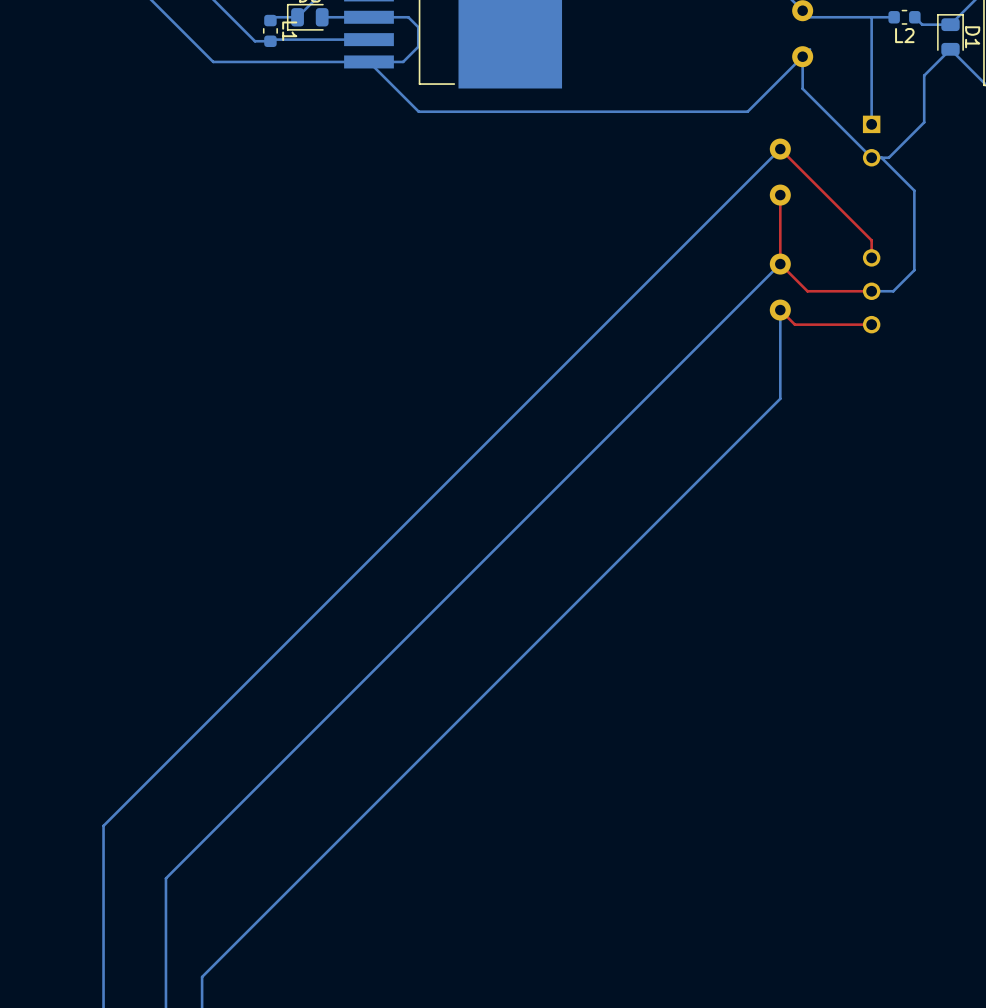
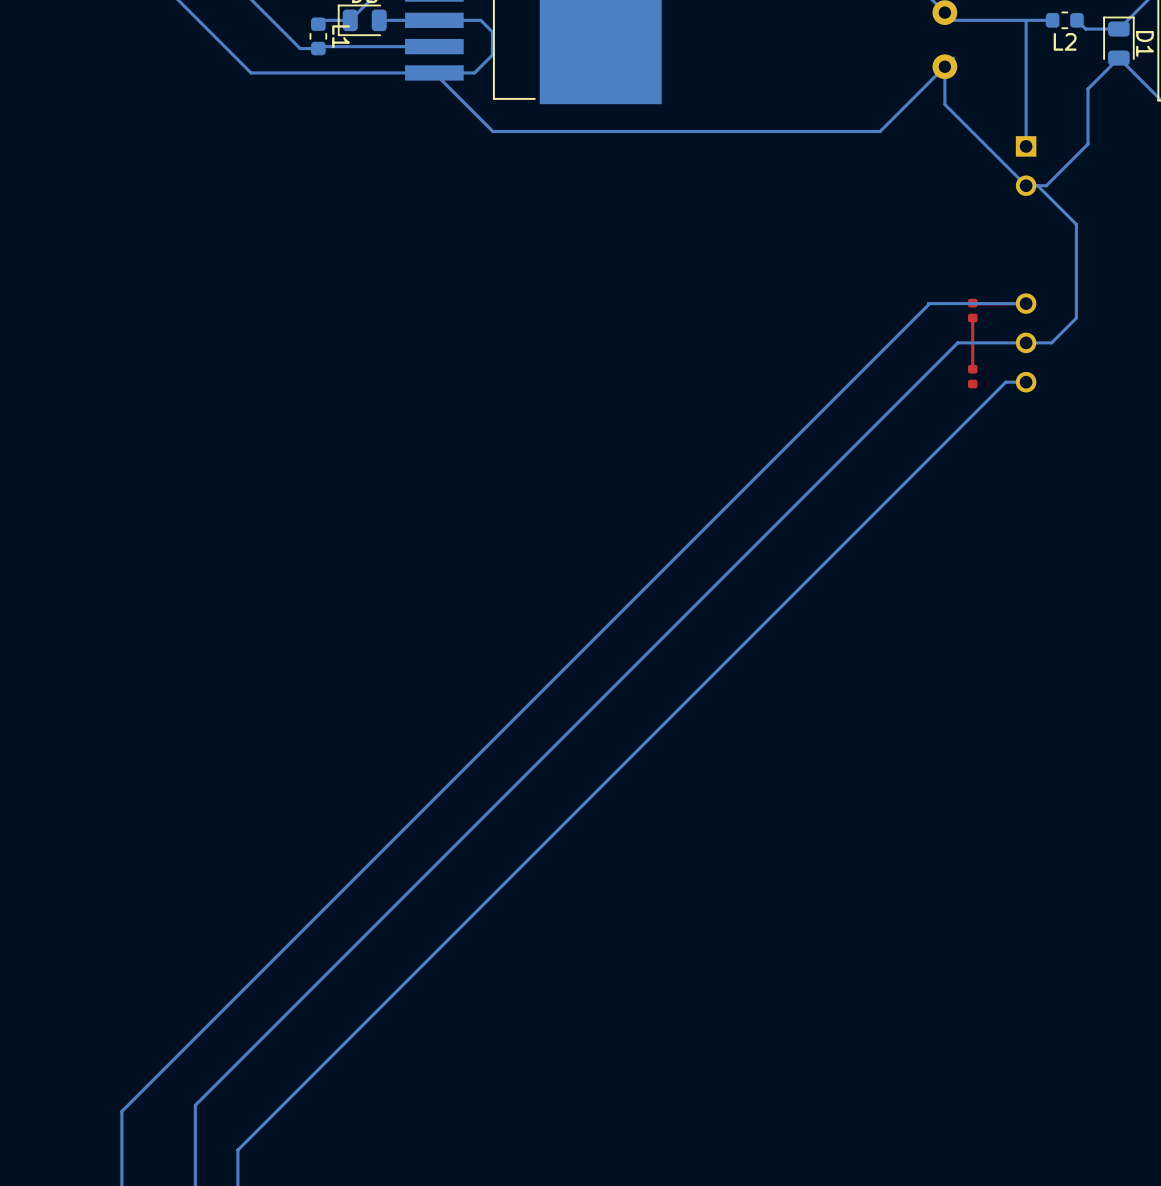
bottom track: (780, 149) (103, 825) (103, 944) -> (1026, 303) (928, 303) (121, 1111)
top track: (780, 149) (871, 240) (871, 257) -> none
part: (780, 172) -> none
top track: (780, 195) (780, 264) (807, 291) (871, 291) -> none
part: none -> (972, 310)
bottom track: (780, 264) (165, 878) (165, 938) -> (1026, 342) (957, 342) (195, 1105)
top track: none -> (972, 317) (972, 369)
part: (780, 287) -> none
bottom track: (780, 310) (780, 398) -> (1026, 382) (1005, 382) (918, 469)
top track: (780, 310) (794, 324) (871, 324) -> none
part: none -> (972, 376)

